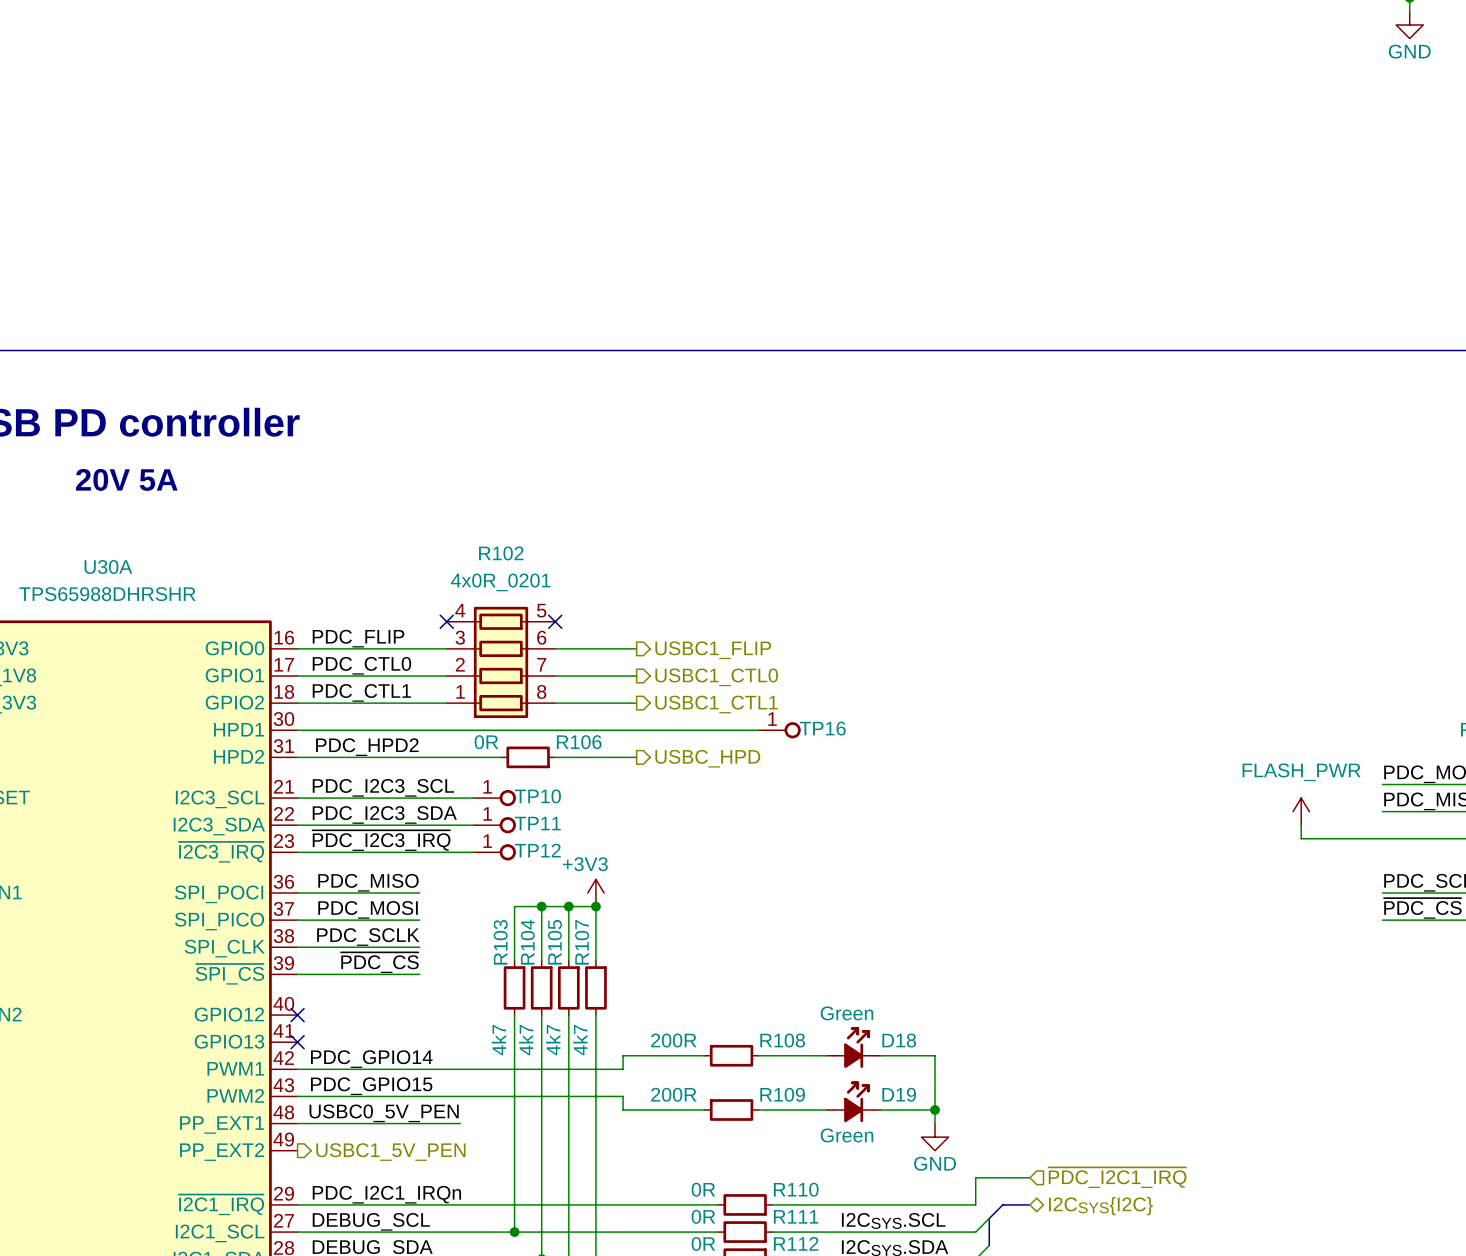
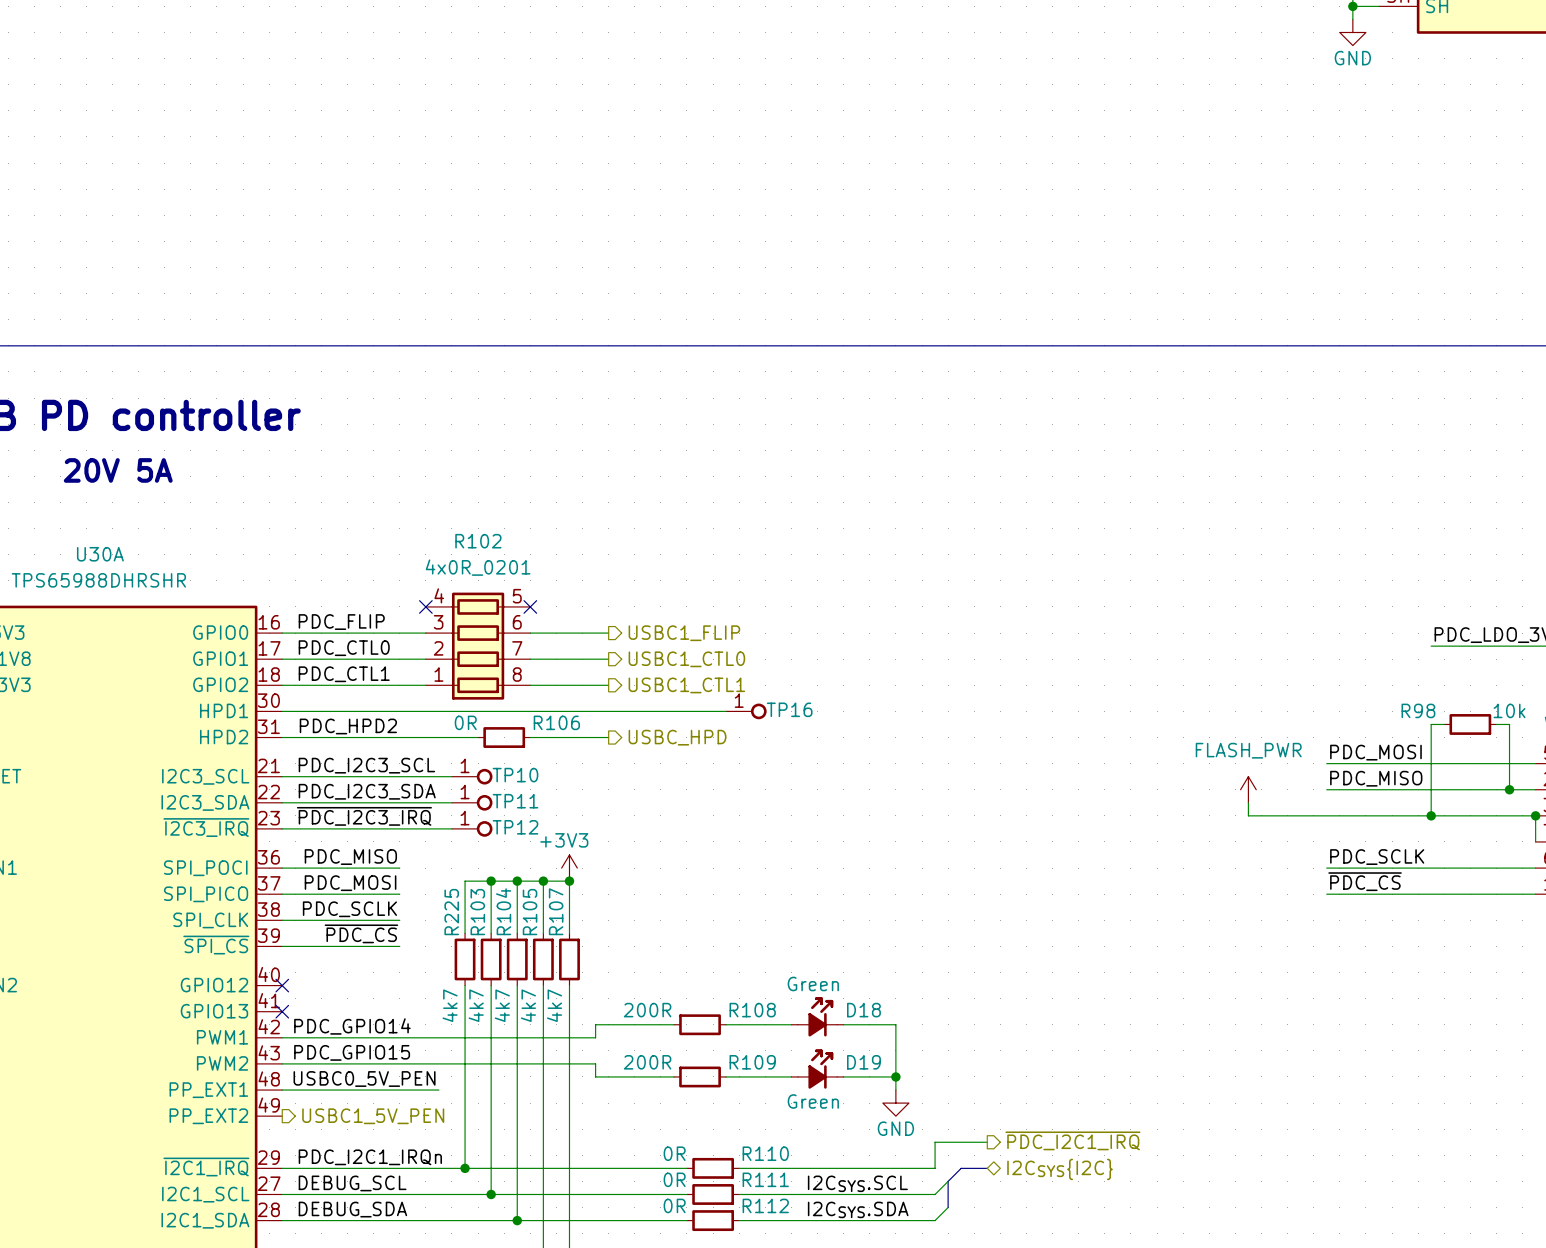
wire: none -> (491, 881) (465, 881) (465, 933)
junction: none -> (491, 881)
R225: none -> (465, 959)
wire: none -> (465, 985) (465, 1168)
hierarchical label shape: input (1117, 1177) -> output (1072, 1140)
junction: none -> (465, 1168)

